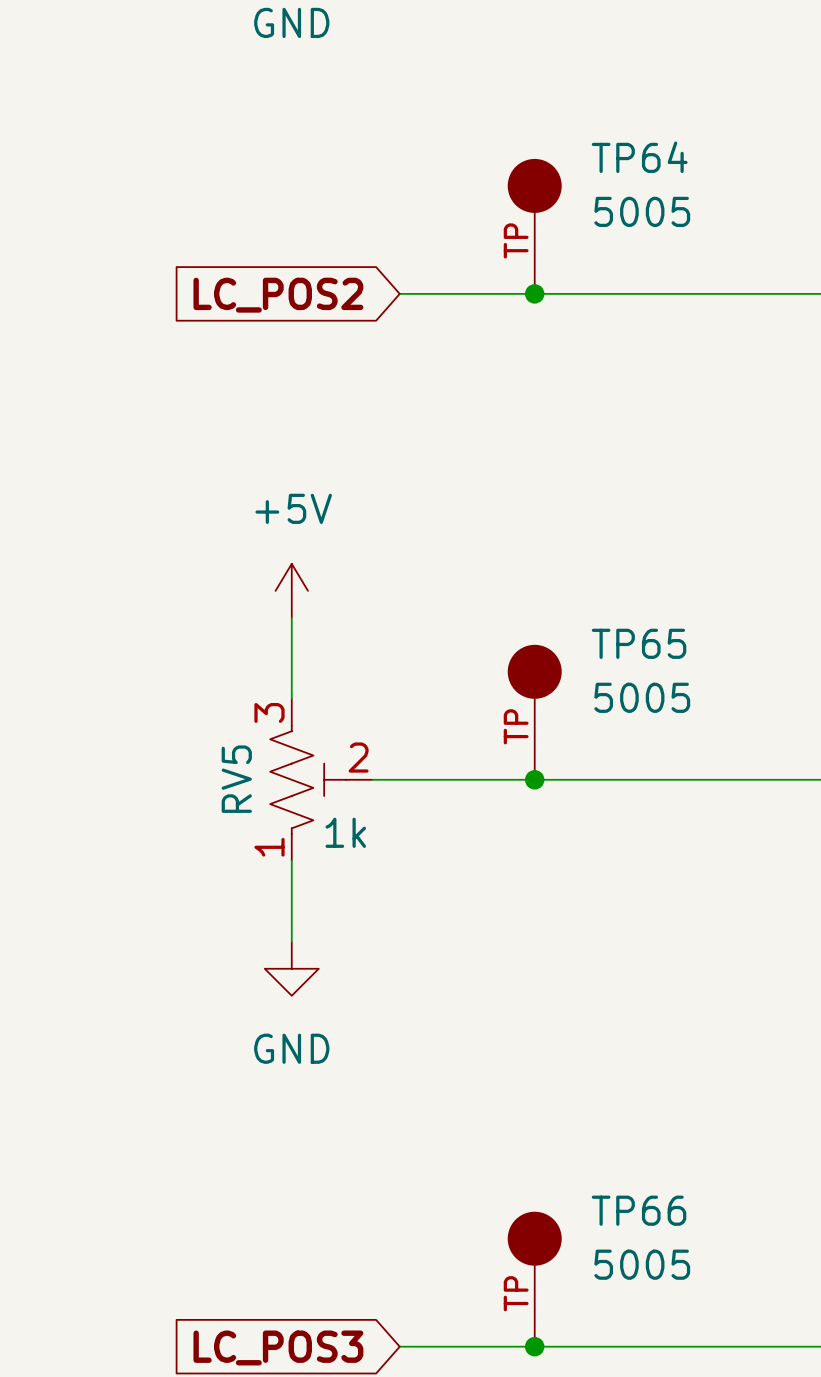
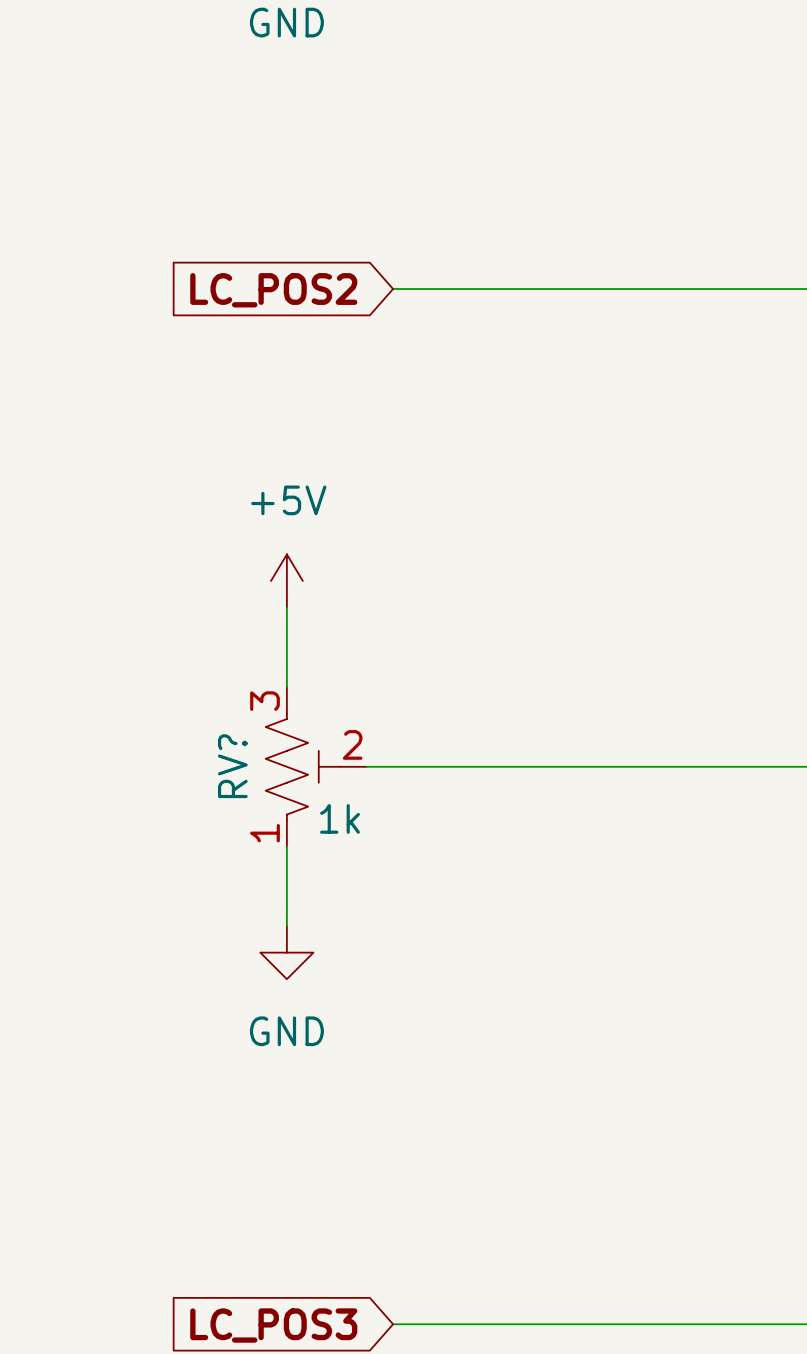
TP64: 5005 (534, 226) -> none
junction: (534, 293) -> none
TP65: 5005 (534, 712) -> none
RV5 name: RV5 (236, 779) -> RV? (232, 766)
junction: (534, 779) -> none
TP66: 5005 (534, 1279) -> none
junction: (534, 1346) -> none

